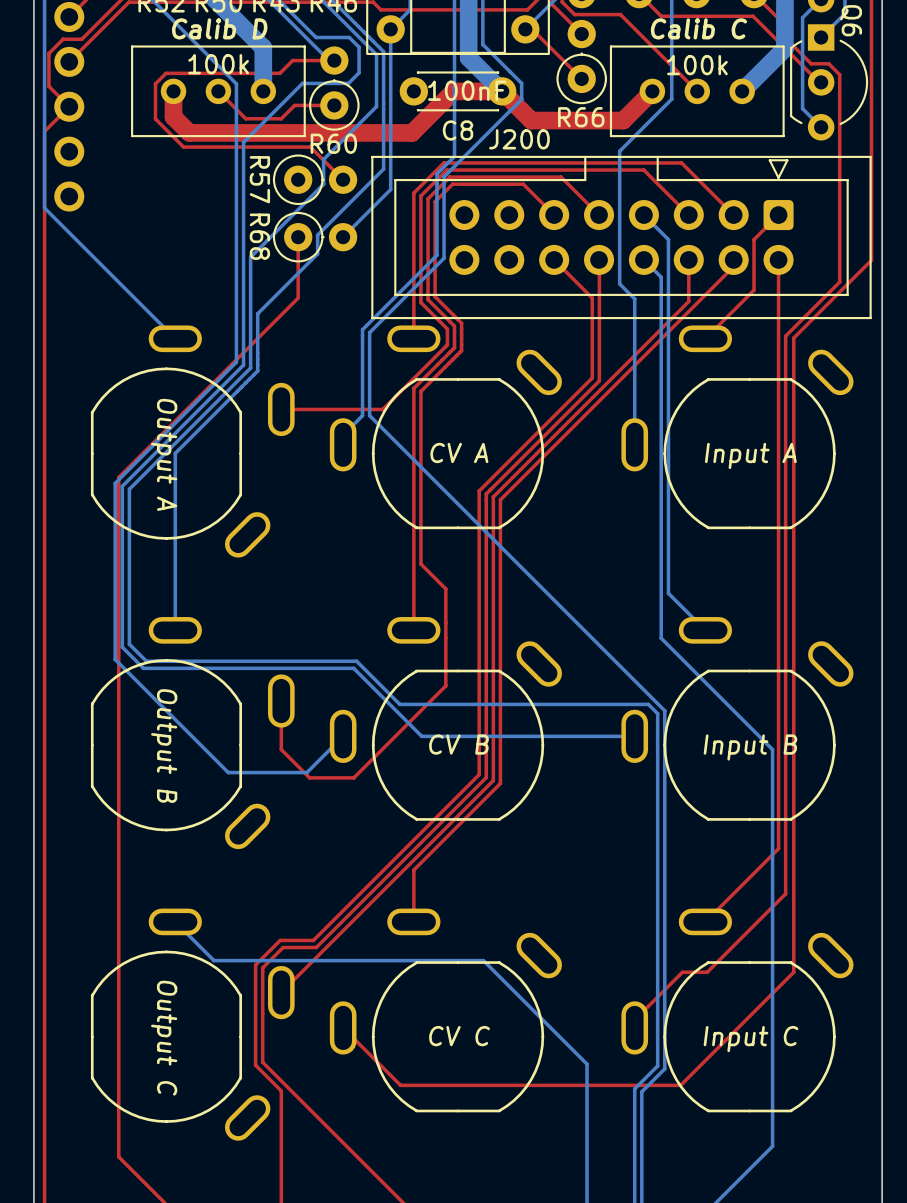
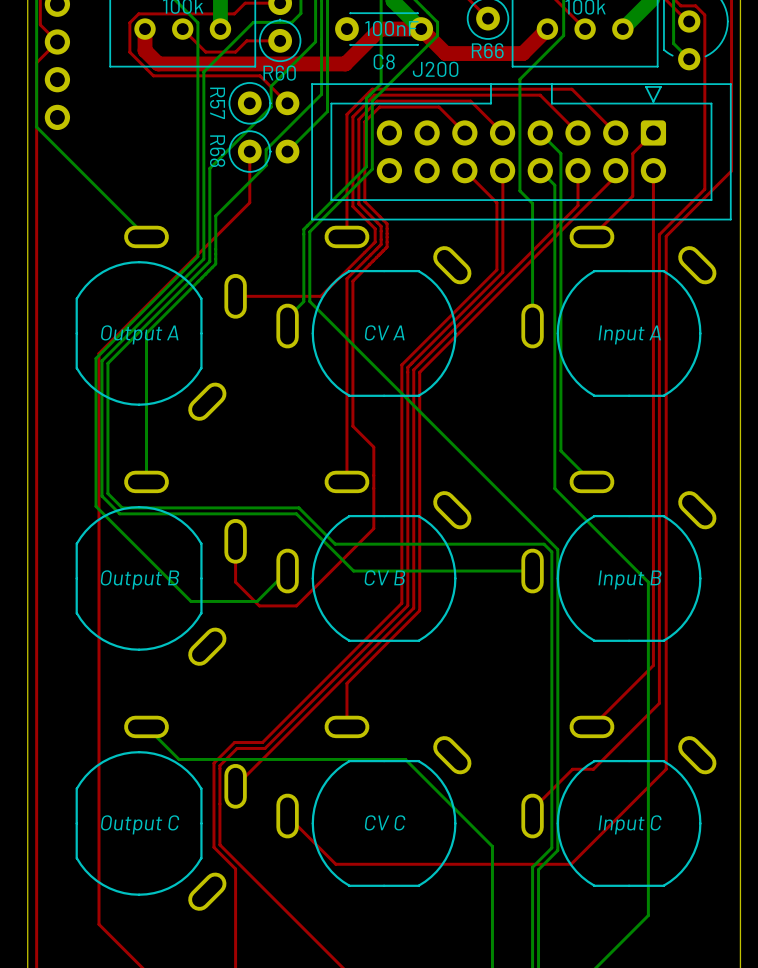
part text rotation: 0° (164, 454) -> 90° counterclockwise (139, 334)
part text rotation: 0° (164, 746) -> 90° counterclockwise (140, 579)
part text rotation: 0° (164, 1038) -> 90° counterclockwise (140, 824)

